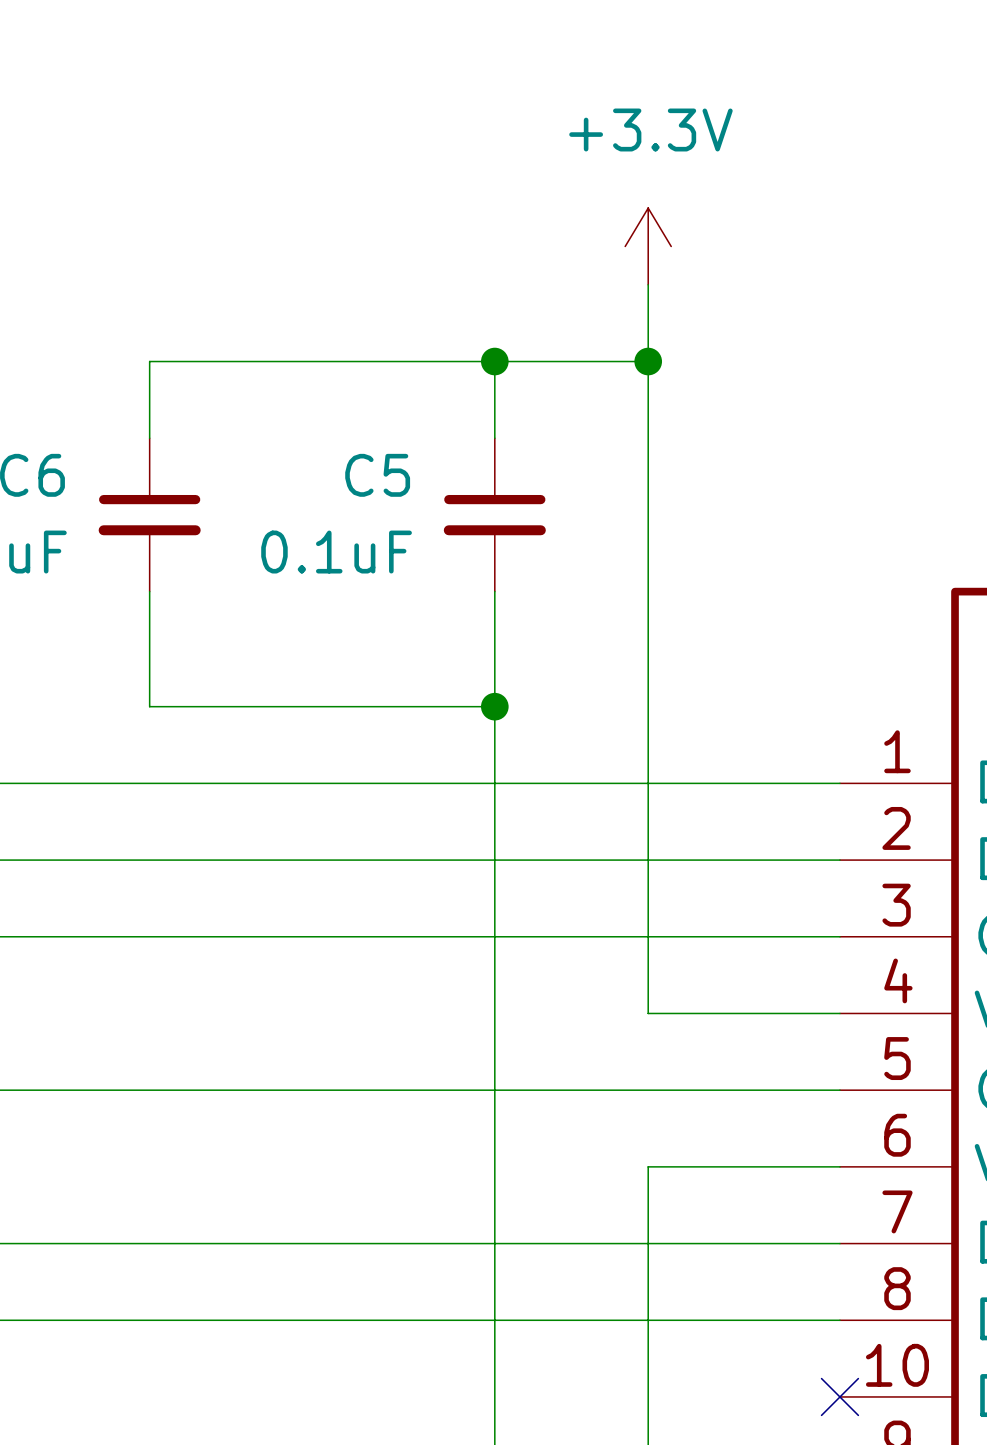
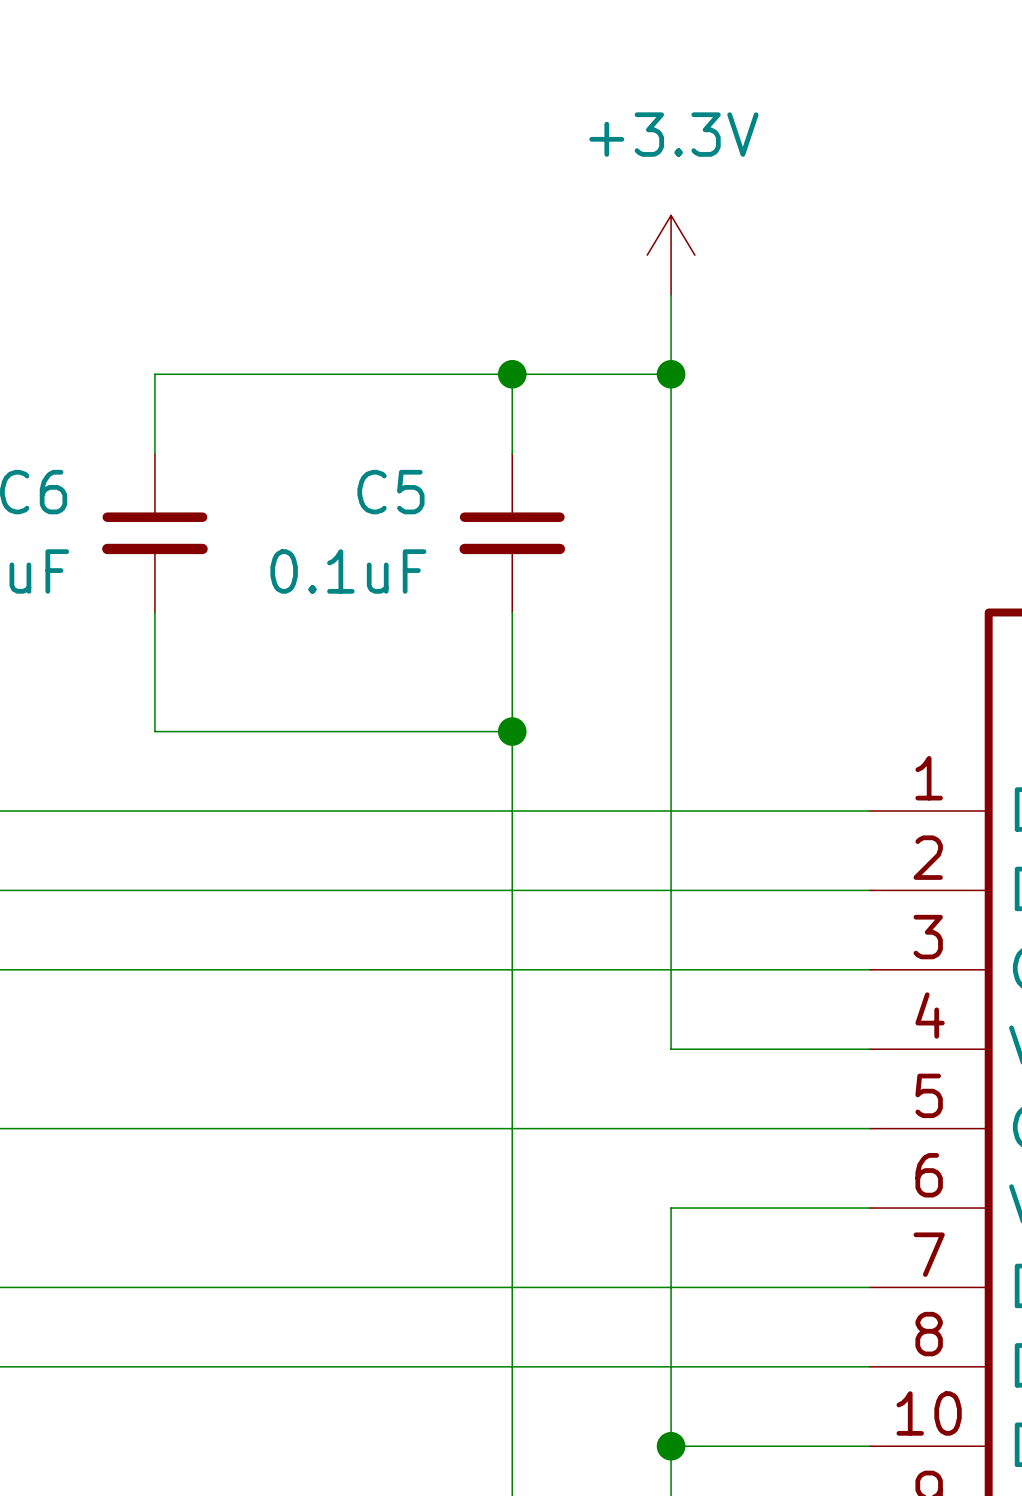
wire: none -> (671, 1446) (869, 1446)
junction: none -> (671, 1446)
no-connect mark: (839, 1396) -> none

